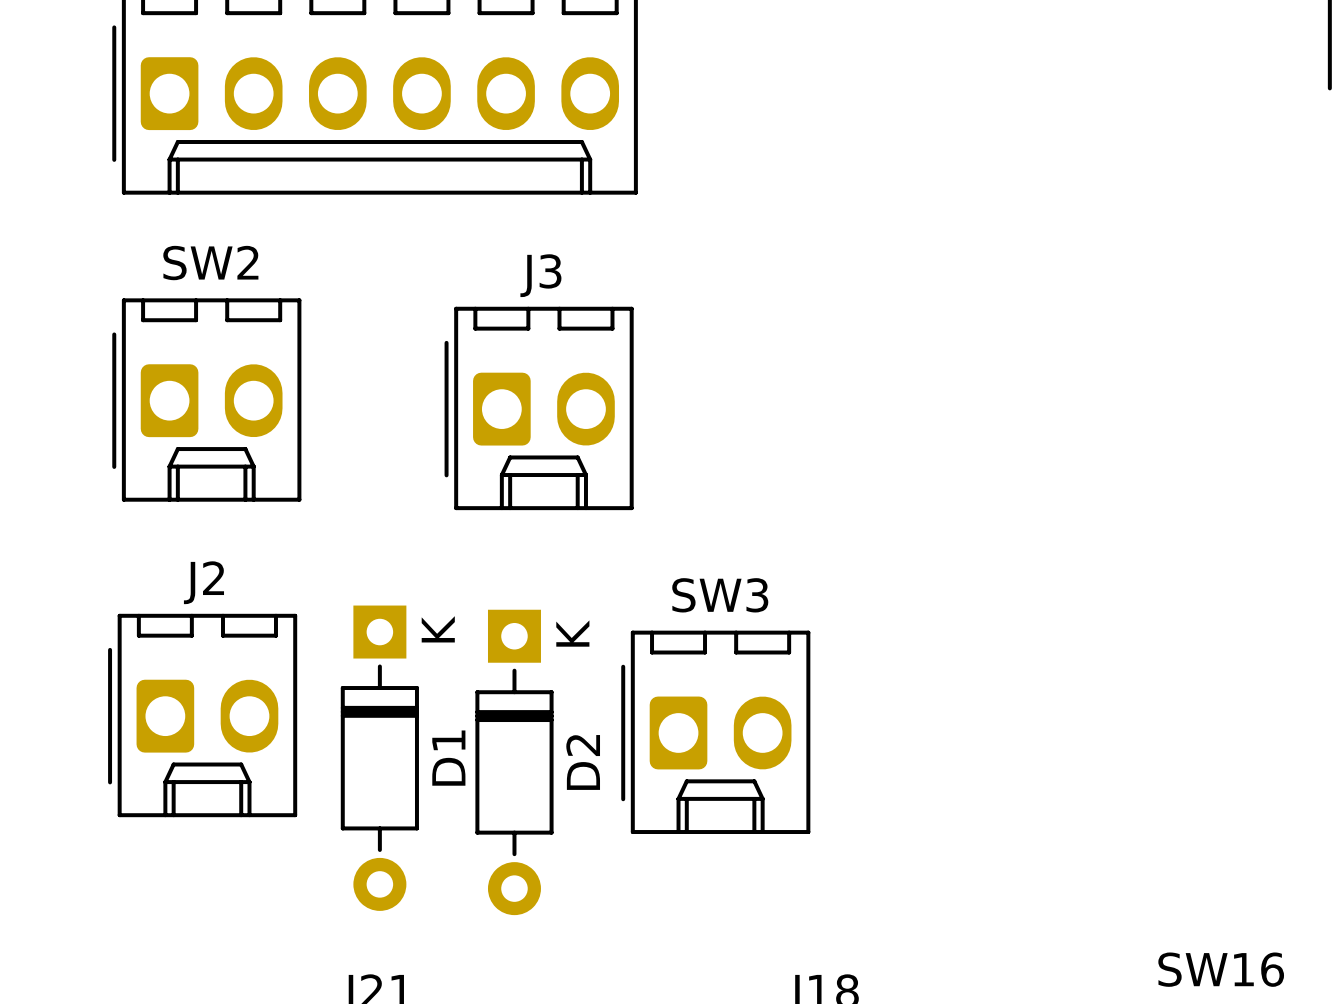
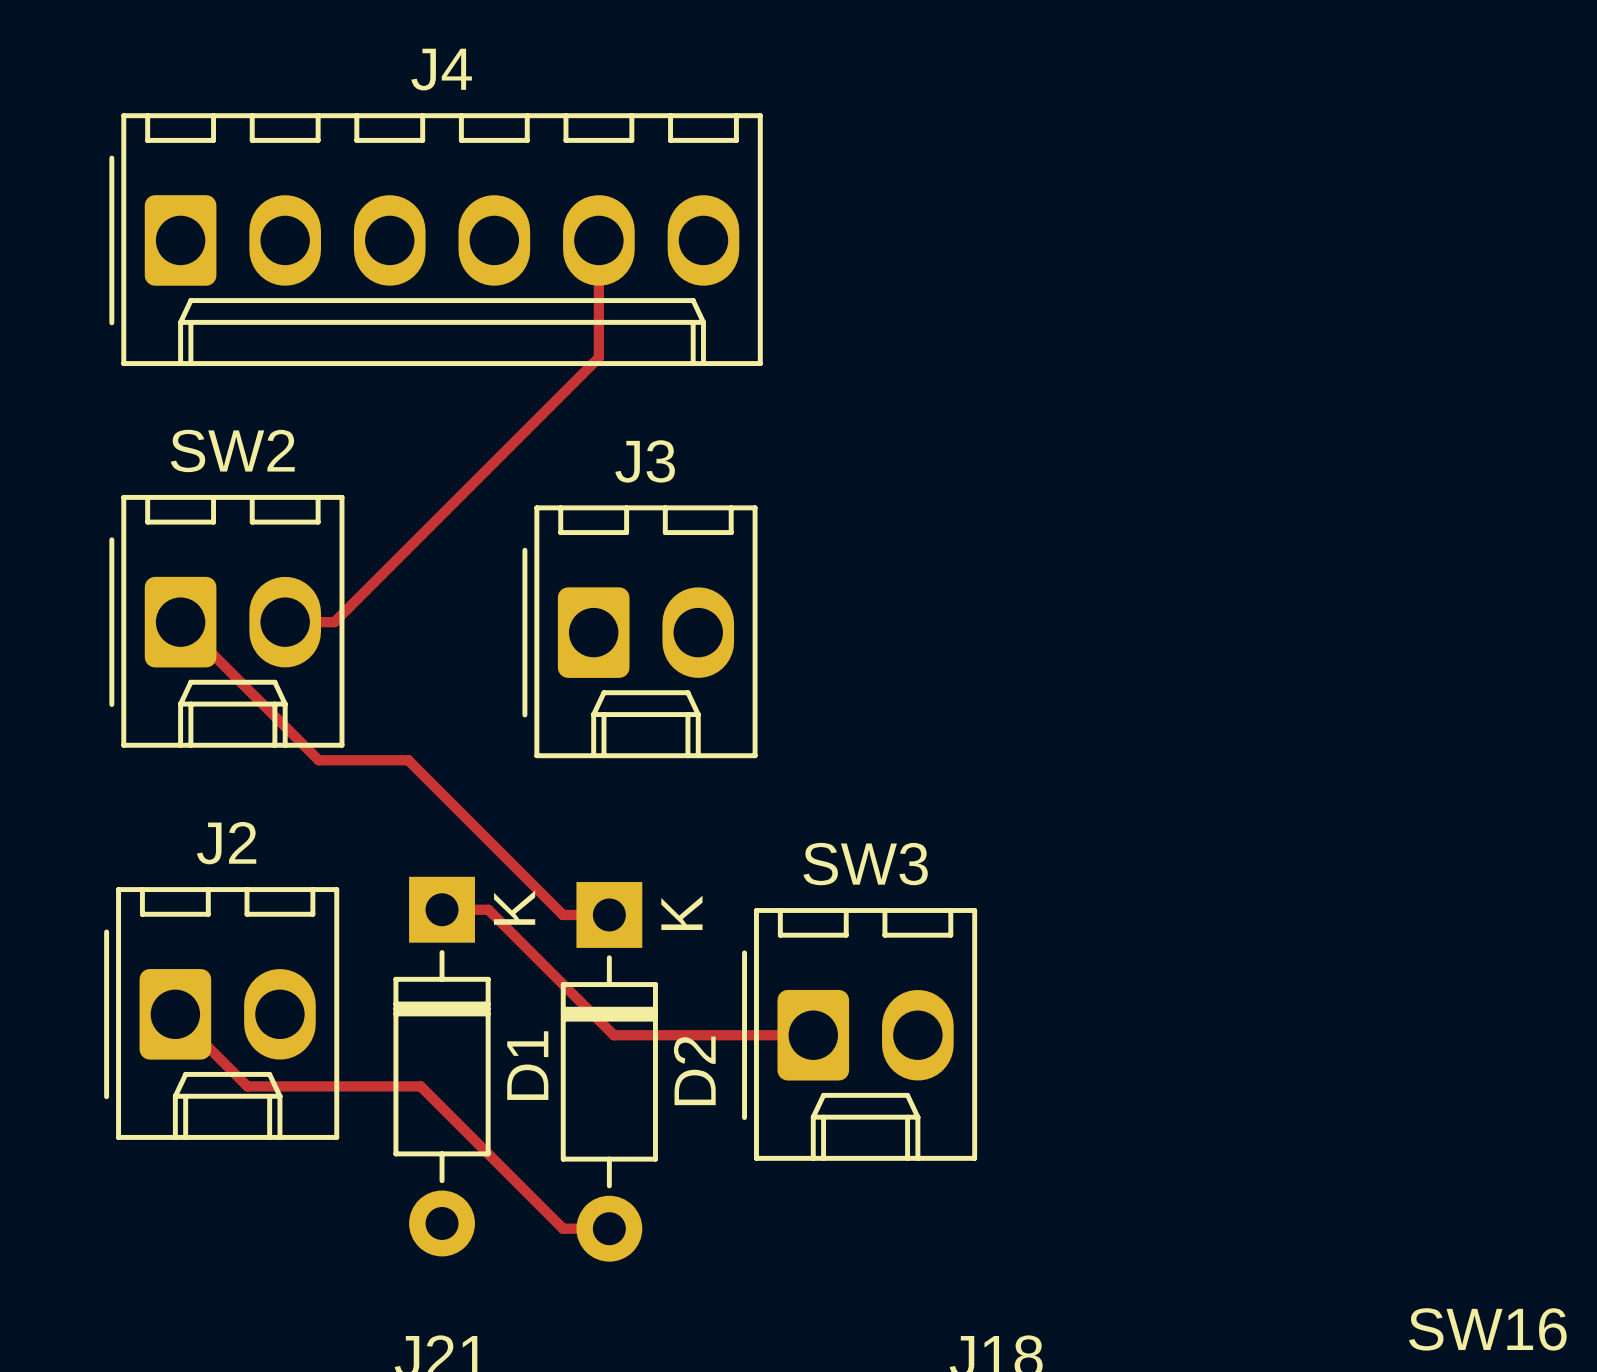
track: none -> (598, 240) (598, 357) (334, 622) (285, 622)
track: none -> (180, 622) (318, 760) (408, 760) (563, 914) (609, 914)
track: none -> (442, 909) (488, 909) (613, 1035) (813, 1035)
track: none -> (175, 1014) (247, 1086) (420, 1086) (563, 1228) (609, 1228)

